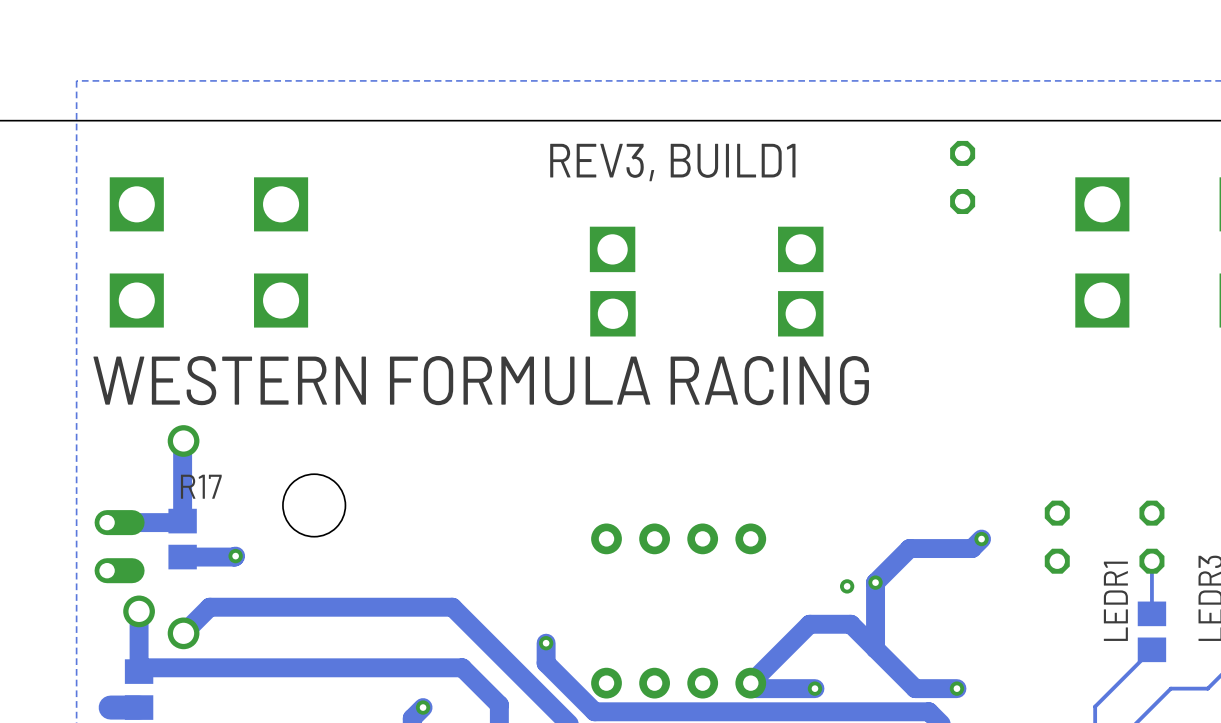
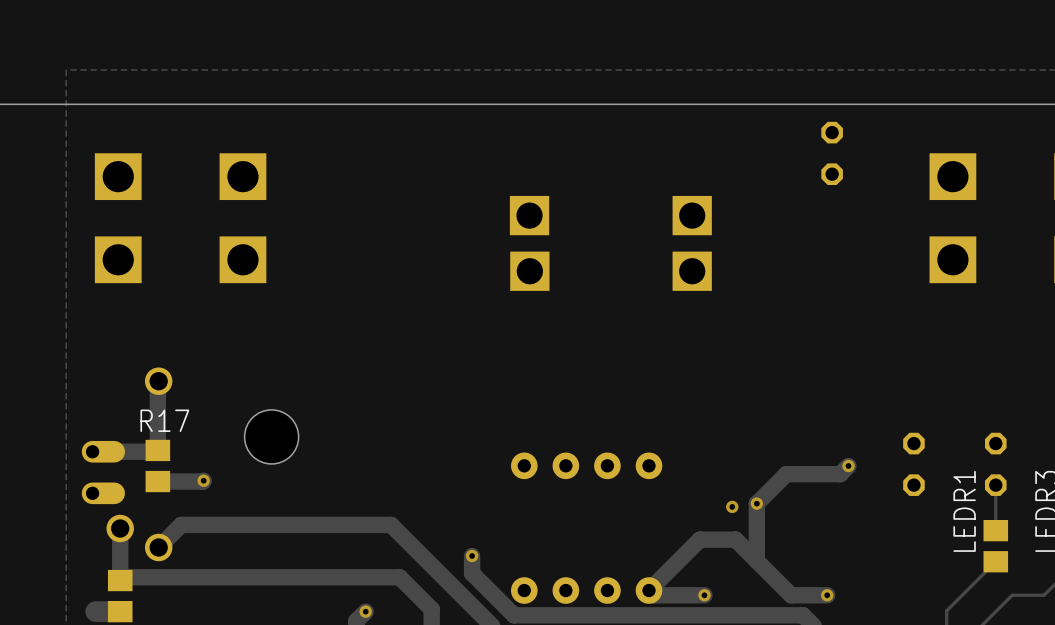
text: REV3, BUILD1 (672, 162) -> none
text: WESTERN FORMULA RACING (481, 380) -> none

